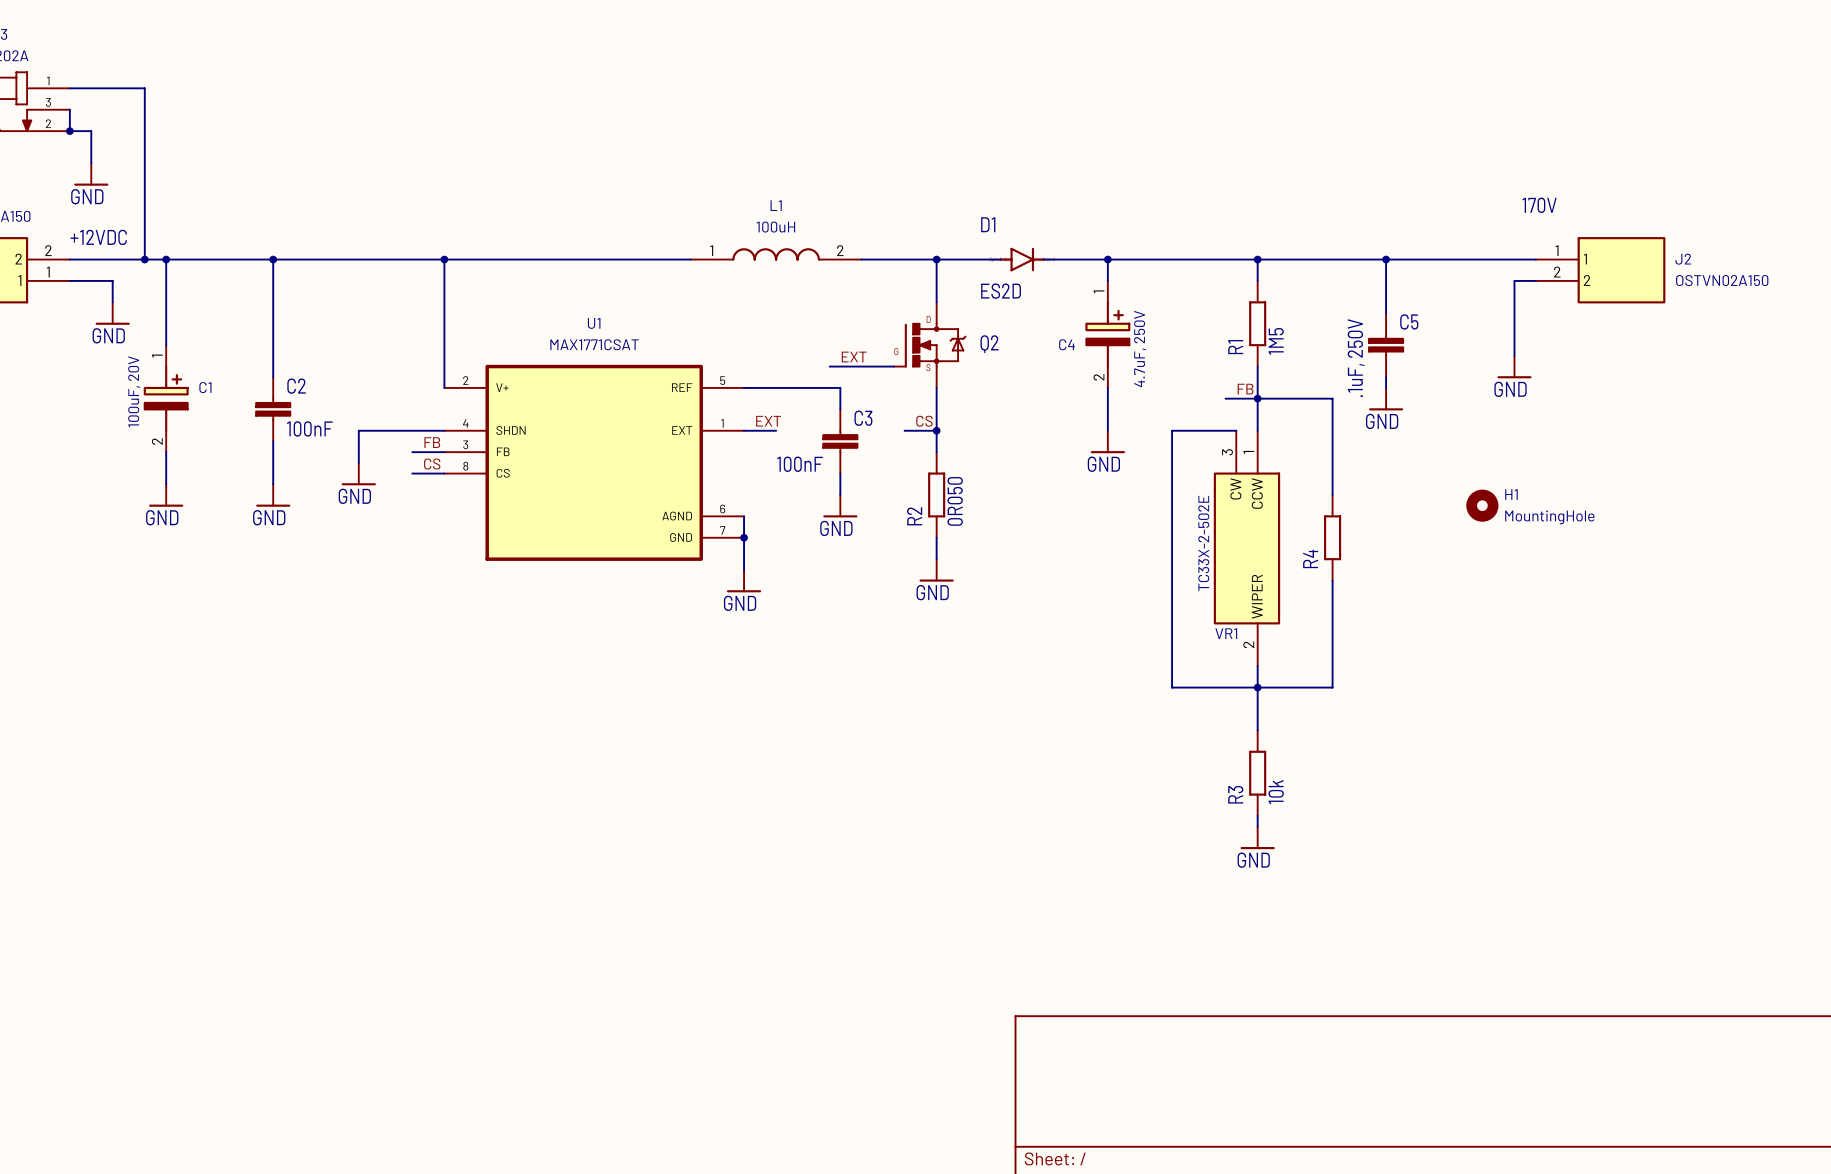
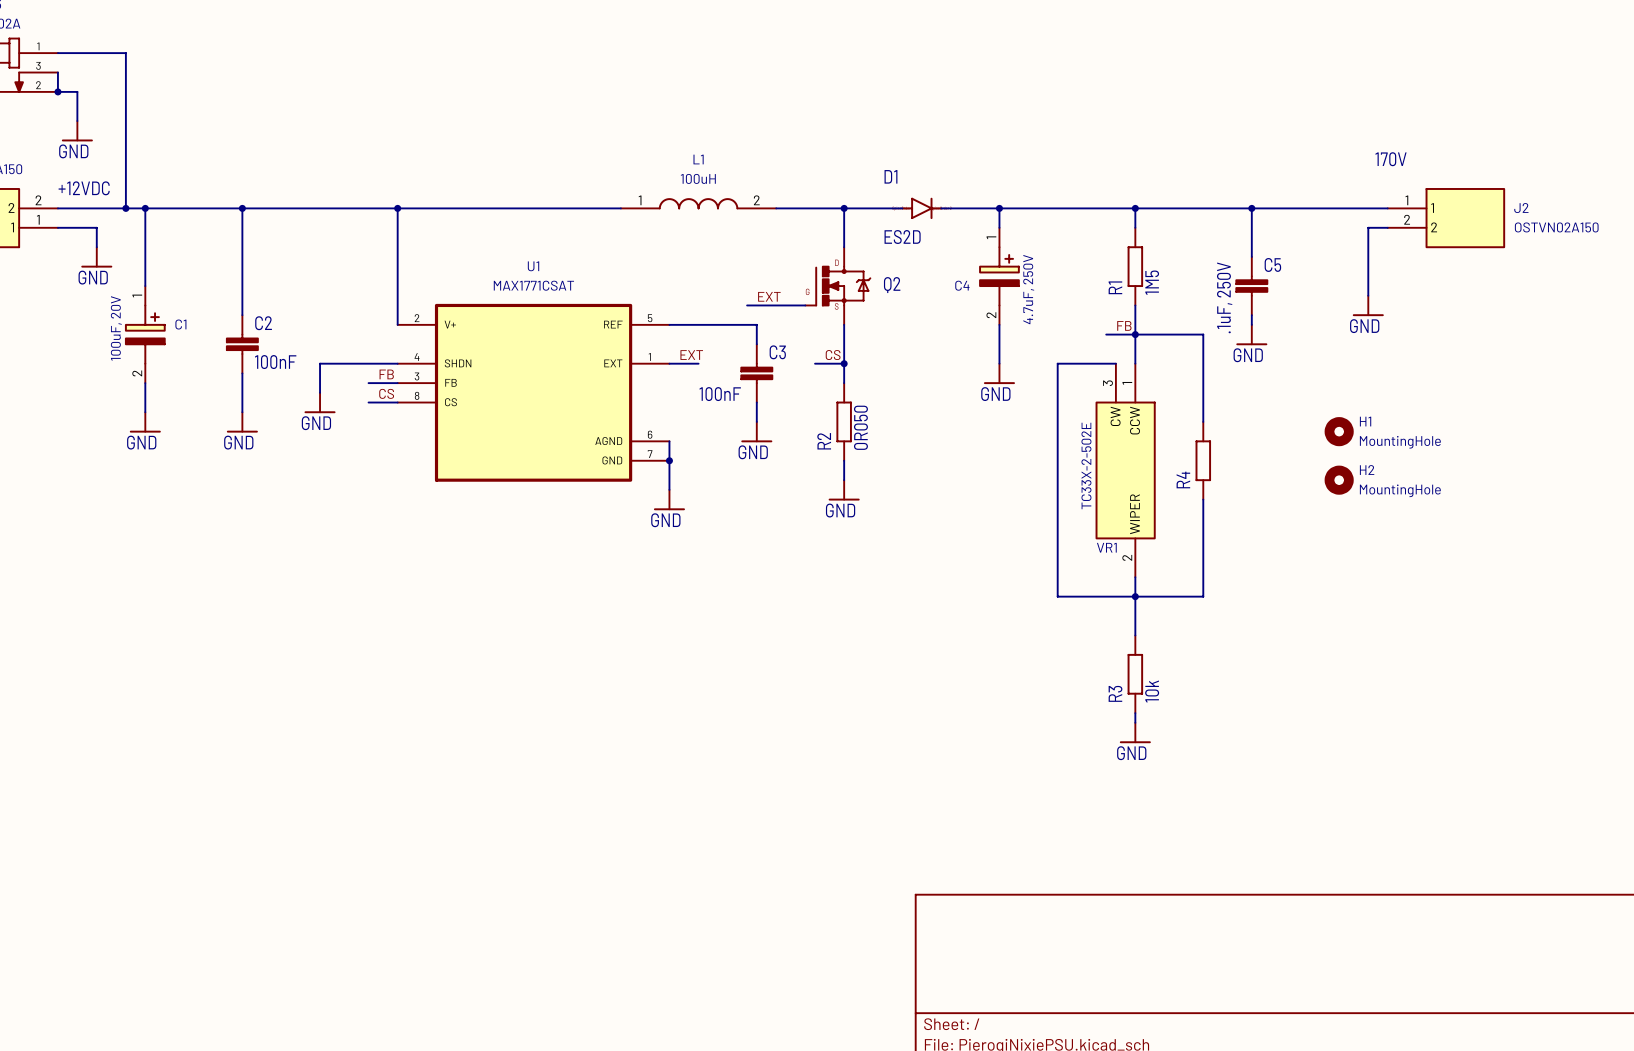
H2: none -> MountingHole (1339, 480)

